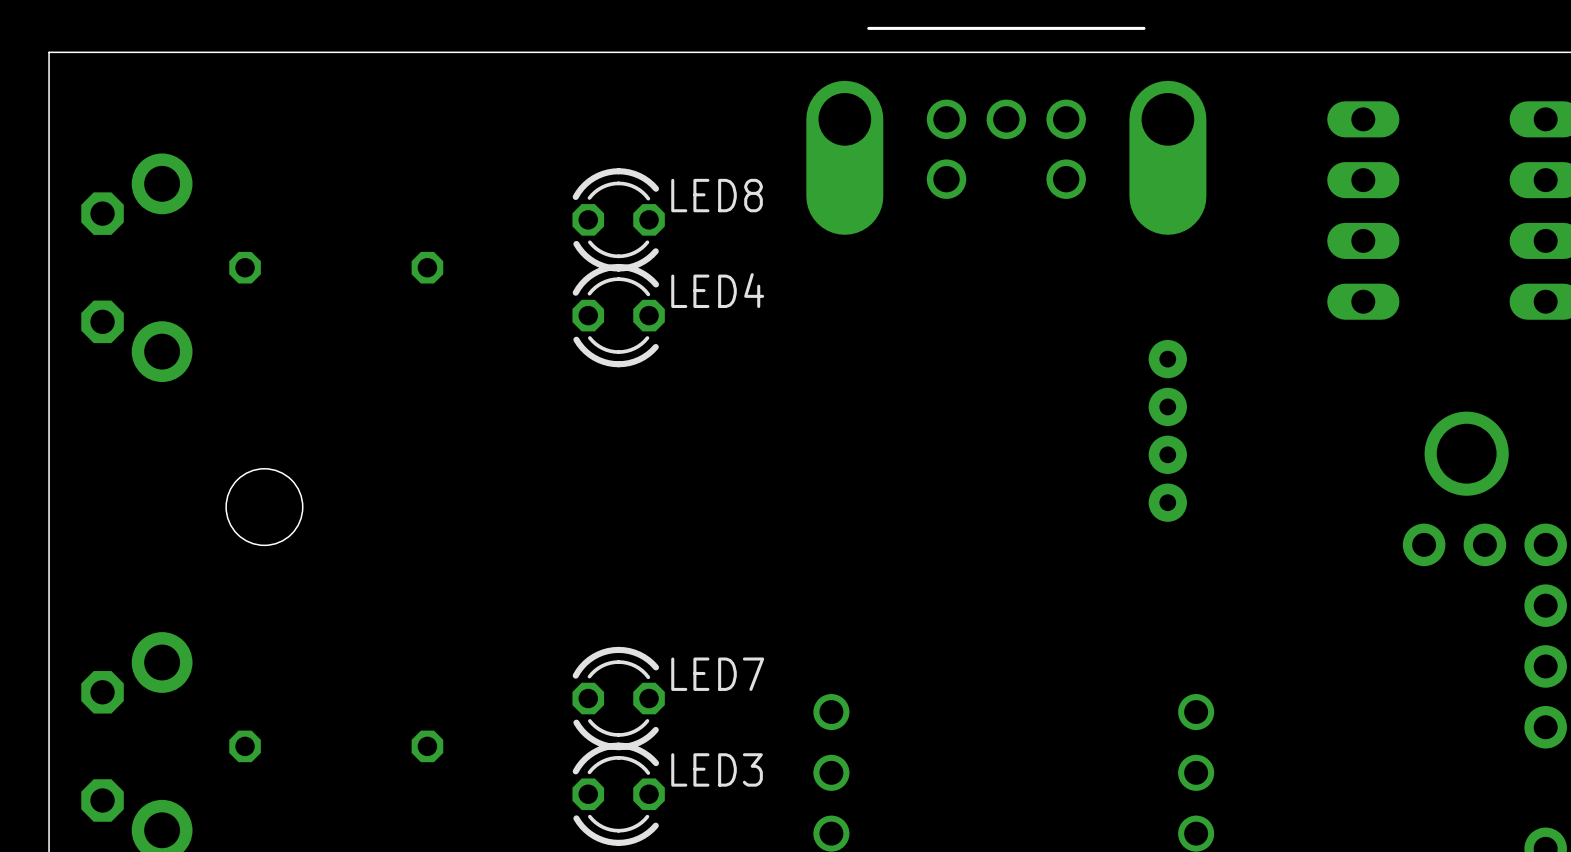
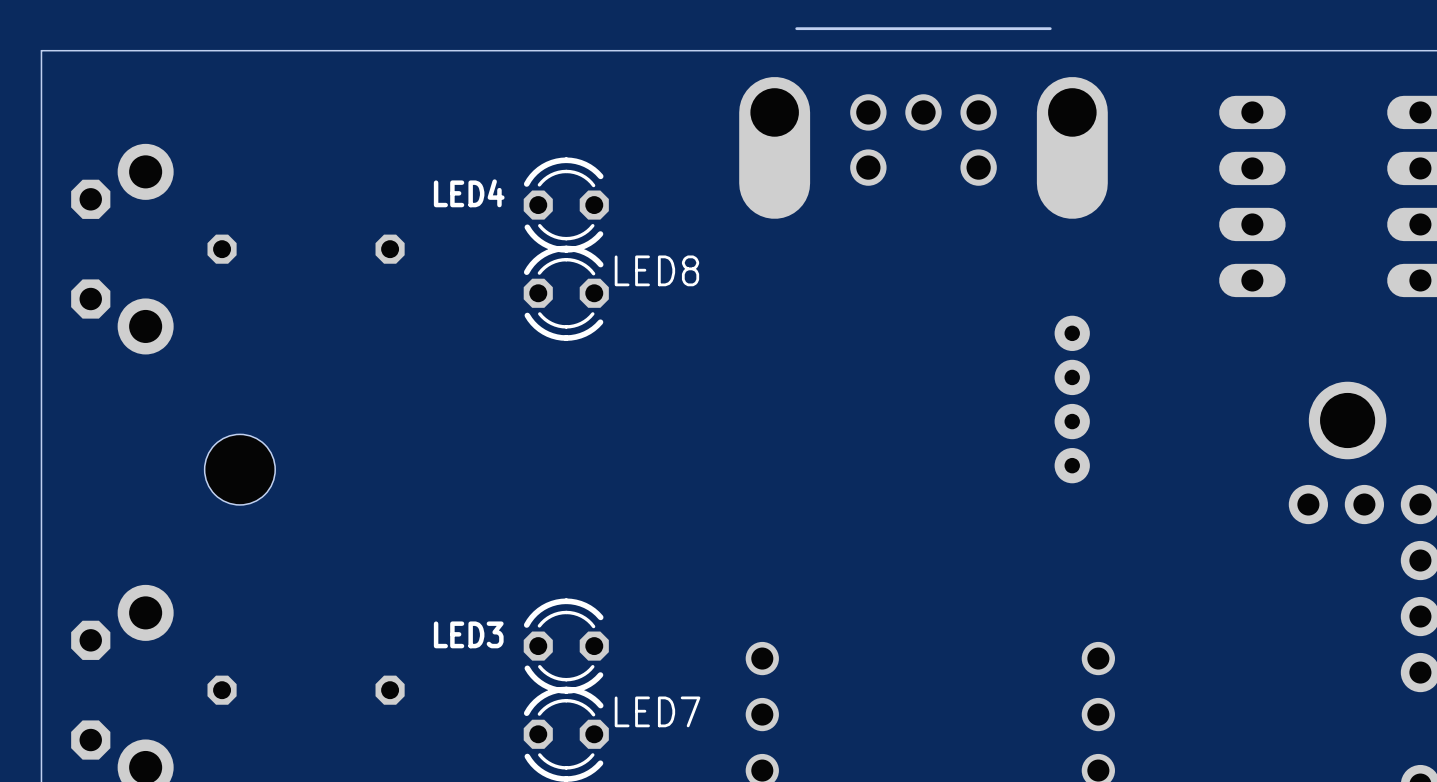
LED8 name: LED8 (717, 195) -> LED4 (469, 193)
LED4 name: LED4 (717, 290) -> LED8 (656, 270)
LED7 name: LED7 (717, 674) -> LED3 (468, 634)
LED3 name: LED3 (717, 769) -> LED7 (657, 711)

